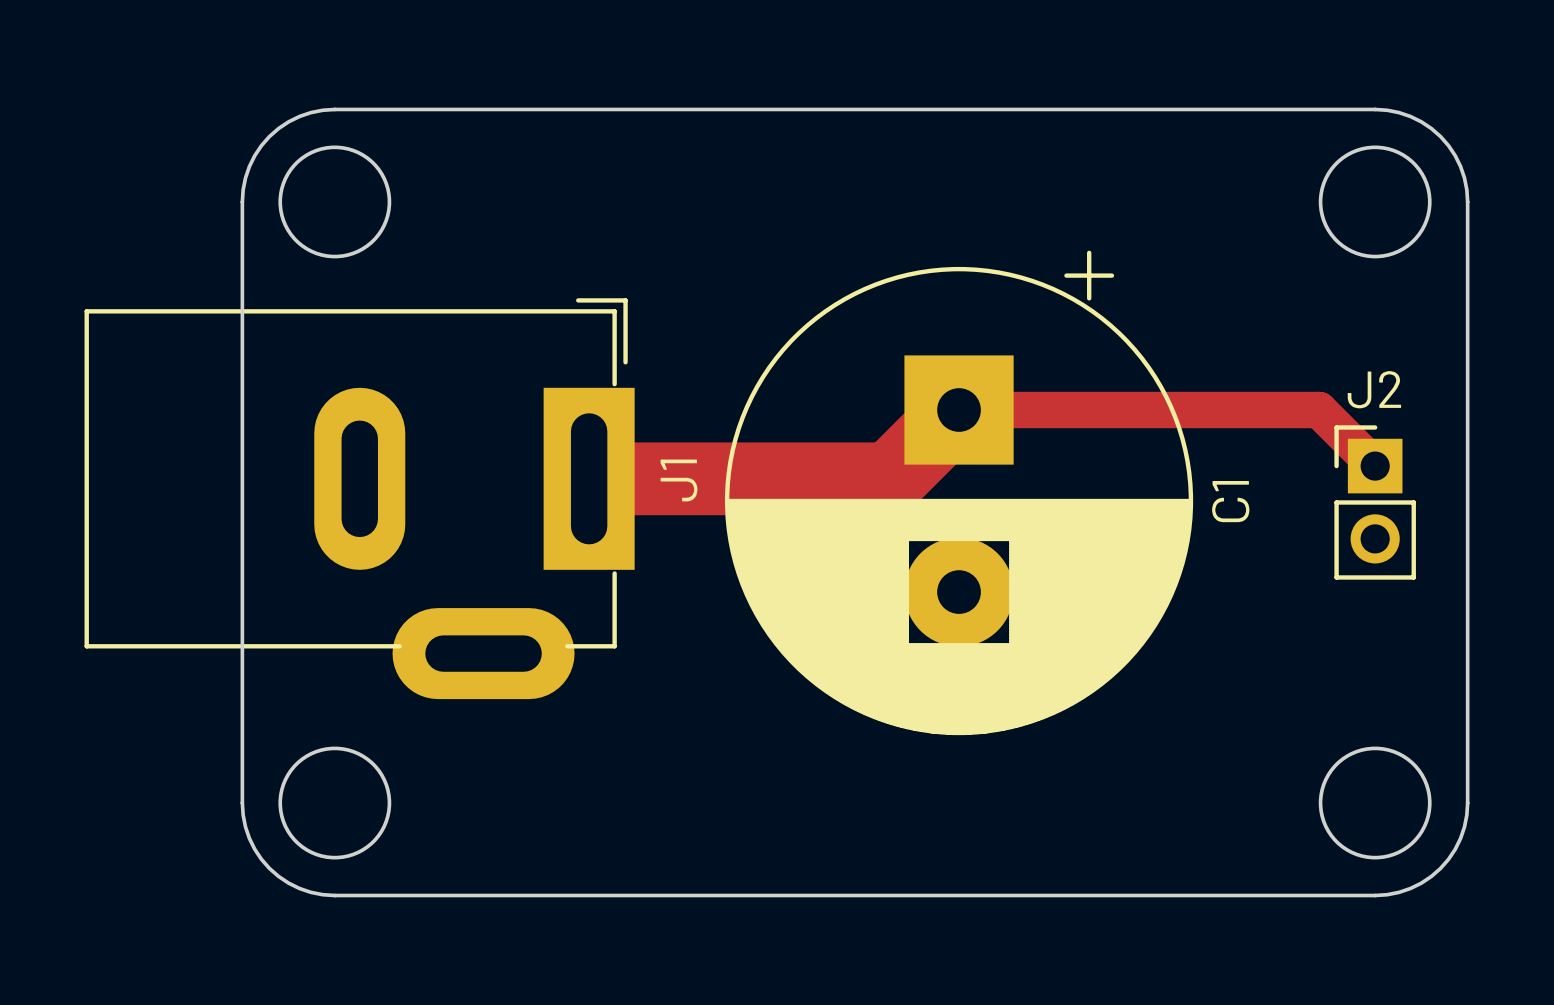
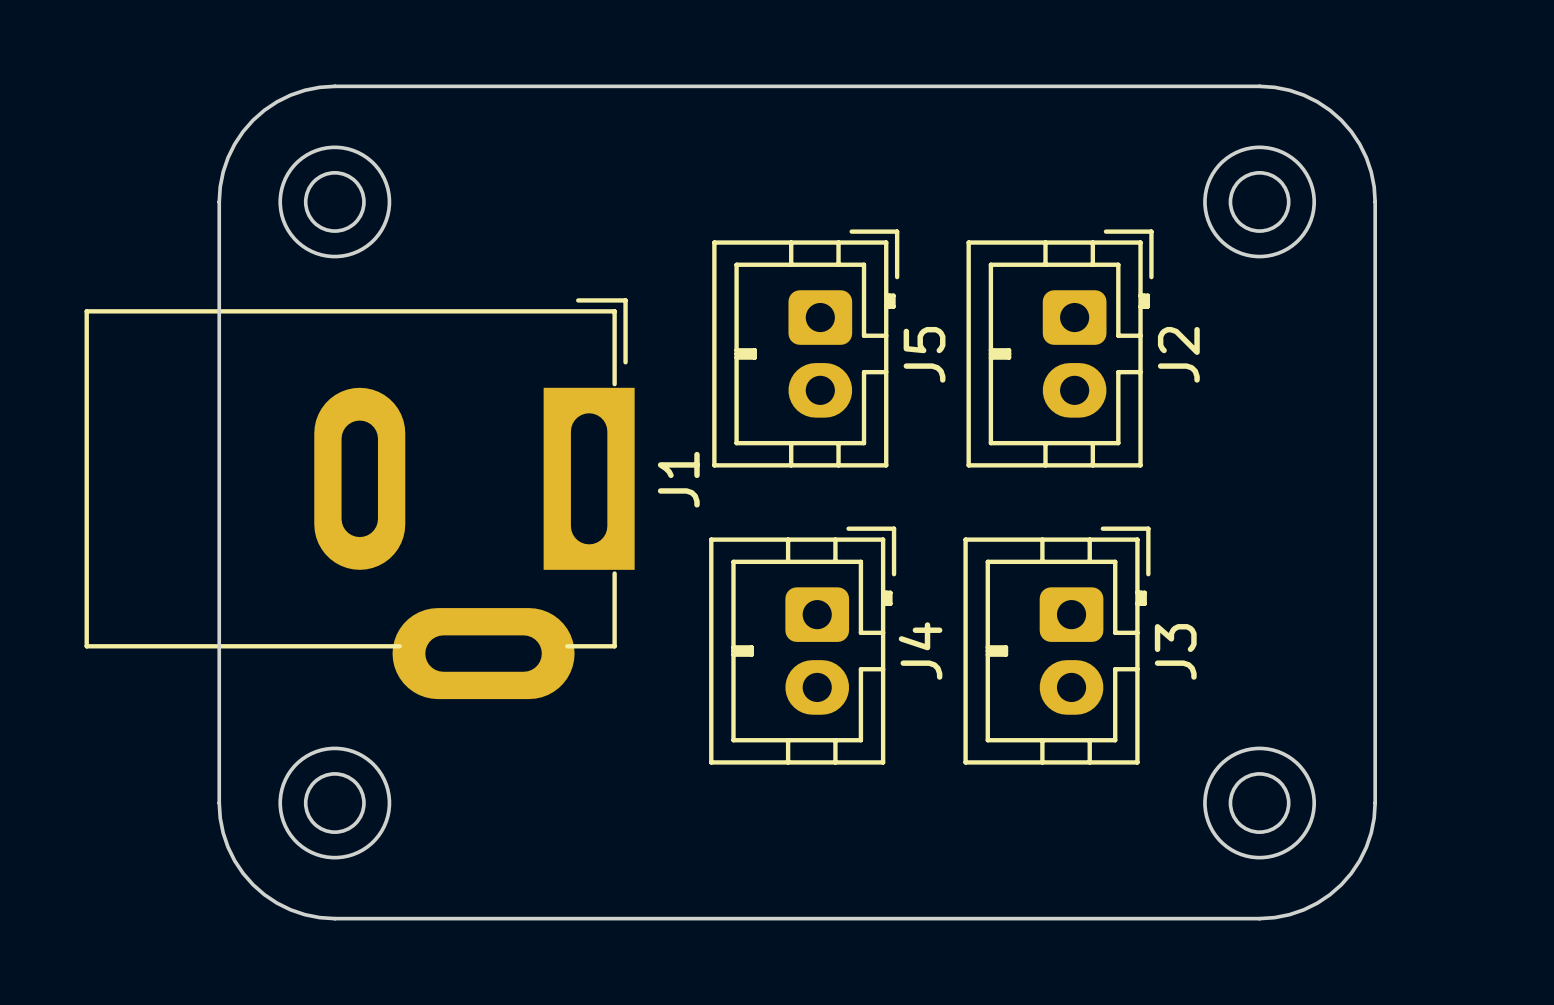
board edge: (334, 109) (1375, 109) (1399, 112) (1421, 121) (1440, 136) (1455, 155) (1464, 178) (1467, 201) (1467, 803) (1464, 826) (1455, 849) (1440, 868) (1421, 883) (1399, 892) (1375, 895) (334, 895) (310, 892) (288, 883) (269, 868) (254, 849) (249, 838) (243, 815) (242, 201) (245, 178) (249, 166) (254, 155) (269, 136) (278, 128) (299, 116) (310, 112) (334, 109) -> (334, 86) (304, 90) (277, 101) (264, 110) (243, 131) (234, 144) (223, 172) (220, 186) (219, 803) (220, 818) (228, 847) (243, 873) (264, 894) (277, 903) (304, 914) (334, 918) (1259, 918) (1274, 917) (1303, 909) (1329, 894) (1351, 873) (1366, 847) (1371, 832) (1375, 803) (1375, 201) (1371, 172) (1359, 144) (1341, 120) (1329, 110) (1303, 95) (1274, 87) (1259, 86) (334, 86)
round board edge: none -> [303, 171, 366, 233]
round board edge: none -> [1228, 171, 1291, 233]
round board edge position: (1375, 201) -> (1259, 201)
J5: none -> (805, 348)
J2 name position: J2 (1374, 389) -> J2 (1178, 354)
J2 footprint: [1334, 425, 1416, 580] -> [966, 229, 1154, 468]
track: (1375, 466) (1319, 410) (959, 410) (890, 478) (589, 478) -> none
C1: (959, 492) -> none
J4: none -> (802, 645)
J3: none -> (1056, 645)
round board edge: none -> [303, 772, 366, 834]
round board edge: none -> [1228, 772, 1291, 834]
round board edge position: (1375, 803) -> (1259, 803)

